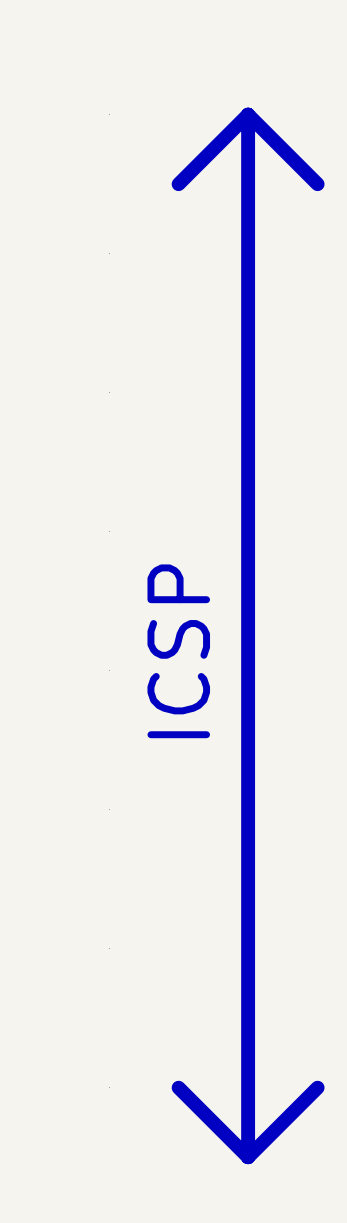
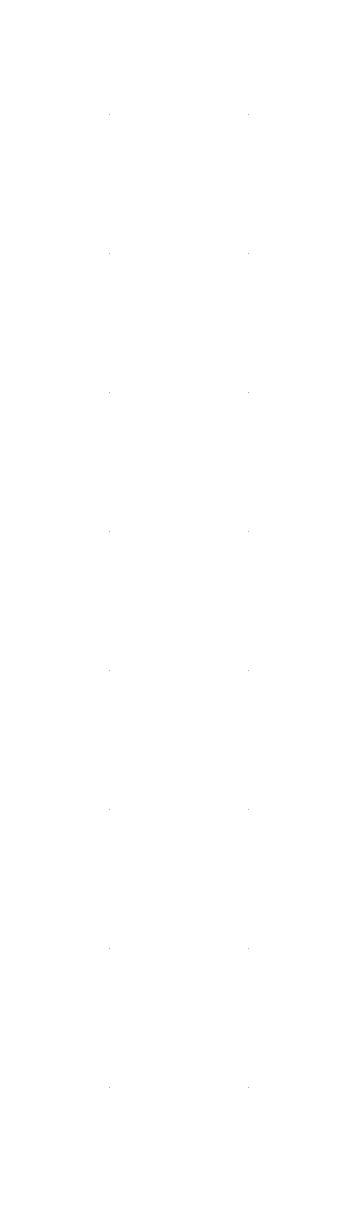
line: (248, 114) (248, 1157) -> none
line: (248, 114) (317, 184) -> none
line: (248, 114) (178, 184) -> none
text: ICSP (178, 651) -> none
line: (178, 1087) (248, 1157) -> none
line: (317, 1087) (248, 1157) -> none

